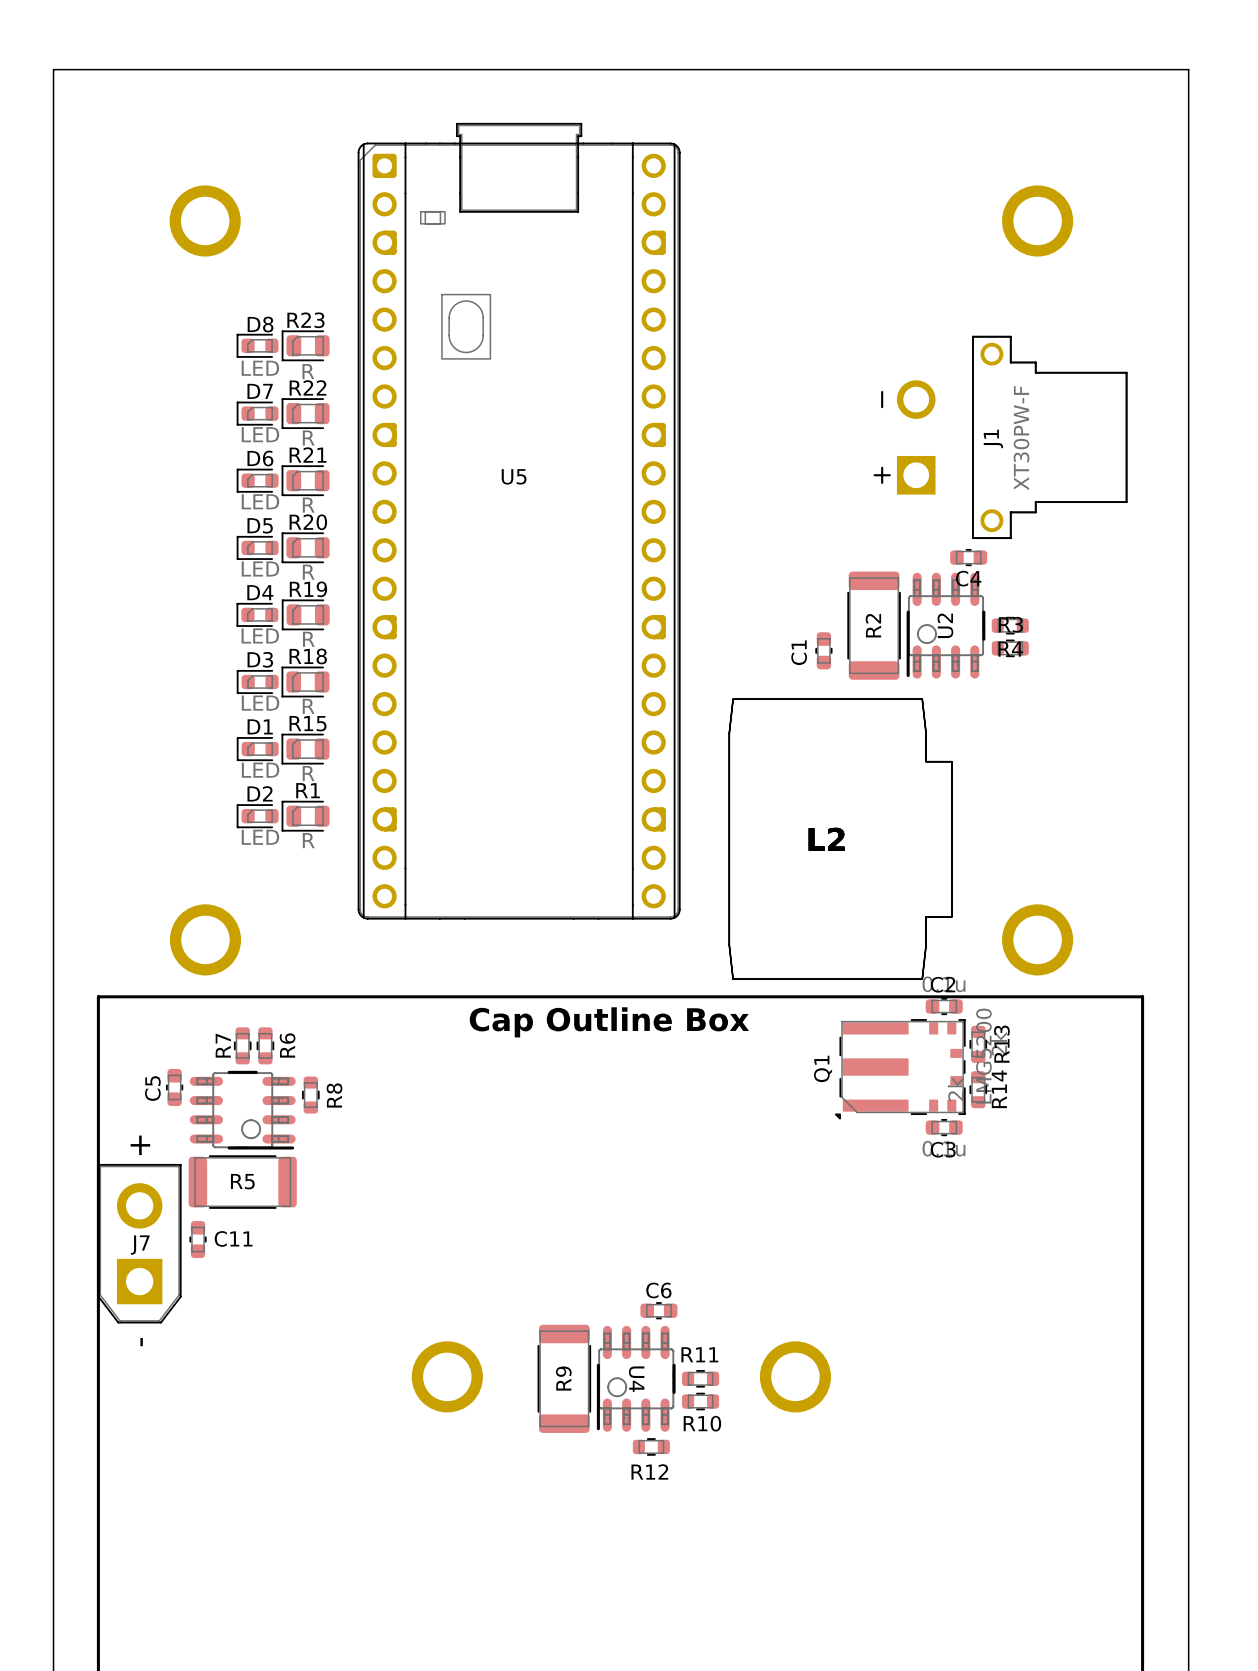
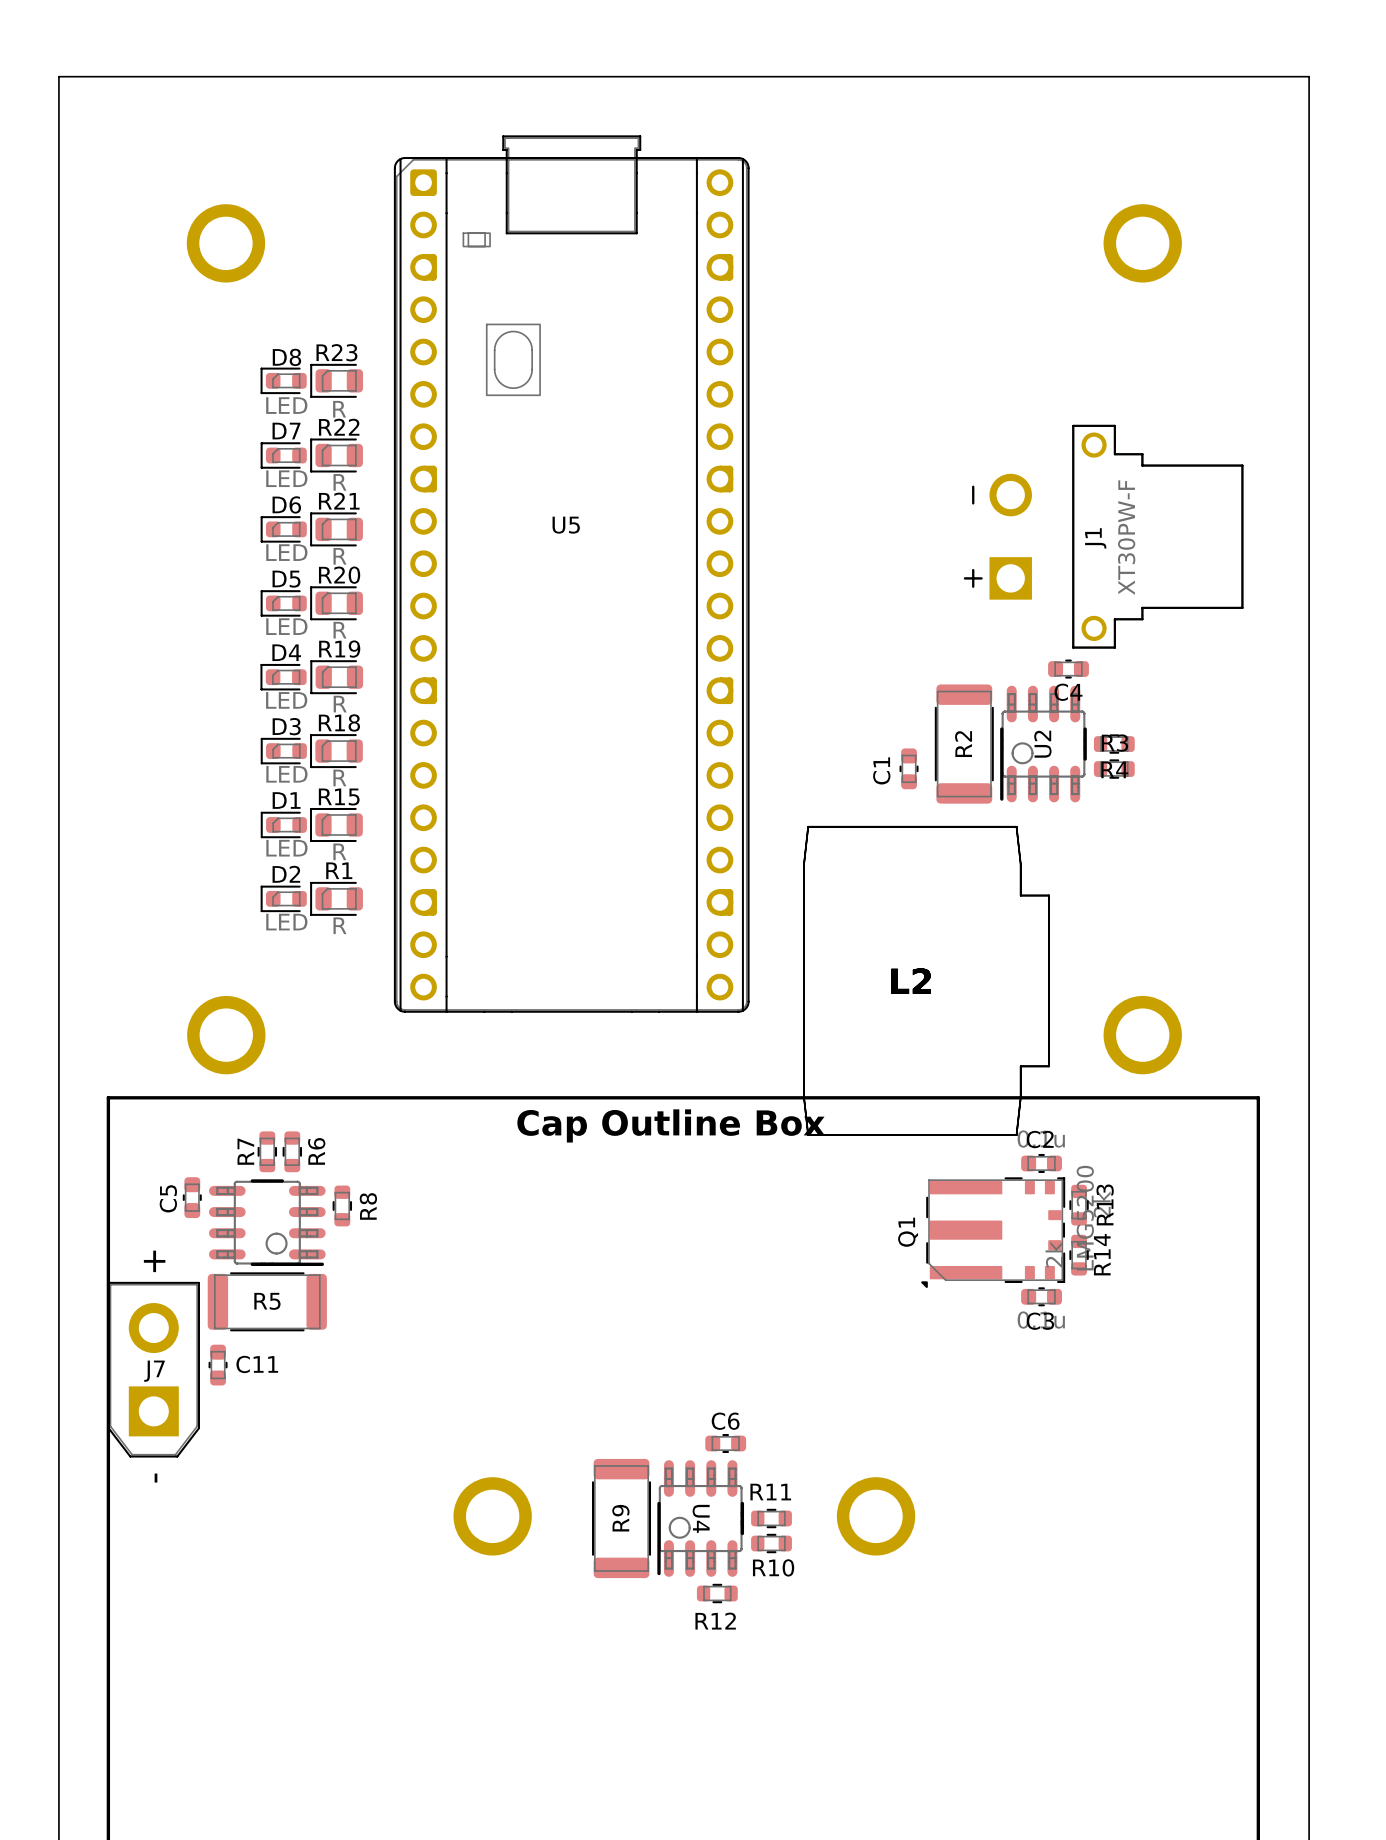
J1 position: (1000, 437) -> (1103, 536)
C4 position: (968, 557) -> (1068, 669)
R2 position: (874, 625) -> (964, 744)
U2 position: (945, 625) -> (1043, 744)
R4 position: (1010, 625) -> (1114, 744)
R3 position: (1010, 648) -> (1114, 769)
C1 position: (823, 650) -> (909, 768)
line: (733, 699) (729, 733) (729, 945) (733, 979) (922, 979) (926, 945) (926, 916) (951, 916) (951, 761) (926, 761) (926, 733) (922, 699) (733, 699) -> (808, 826) (804, 864) (804, 1097) (808, 1135) (1016, 1135) (1020, 1097) (1020, 1066) (1049, 1066) (1049, 895) (1020, 895) (1020, 864) (1016, 826) (808, 826)
text position: L2 (826, 839) -> L2 (911, 981)
C2 position: (944, 1006) -> (1041, 1163)
R13 position: (978, 1044) -> (1079, 1205)
Q1 position: (900, 1069) -> (993, 1232)
R14 position: (978, 1089) -> (1079, 1255)
C3 position: (944, 1127) -> (1041, 1296)

